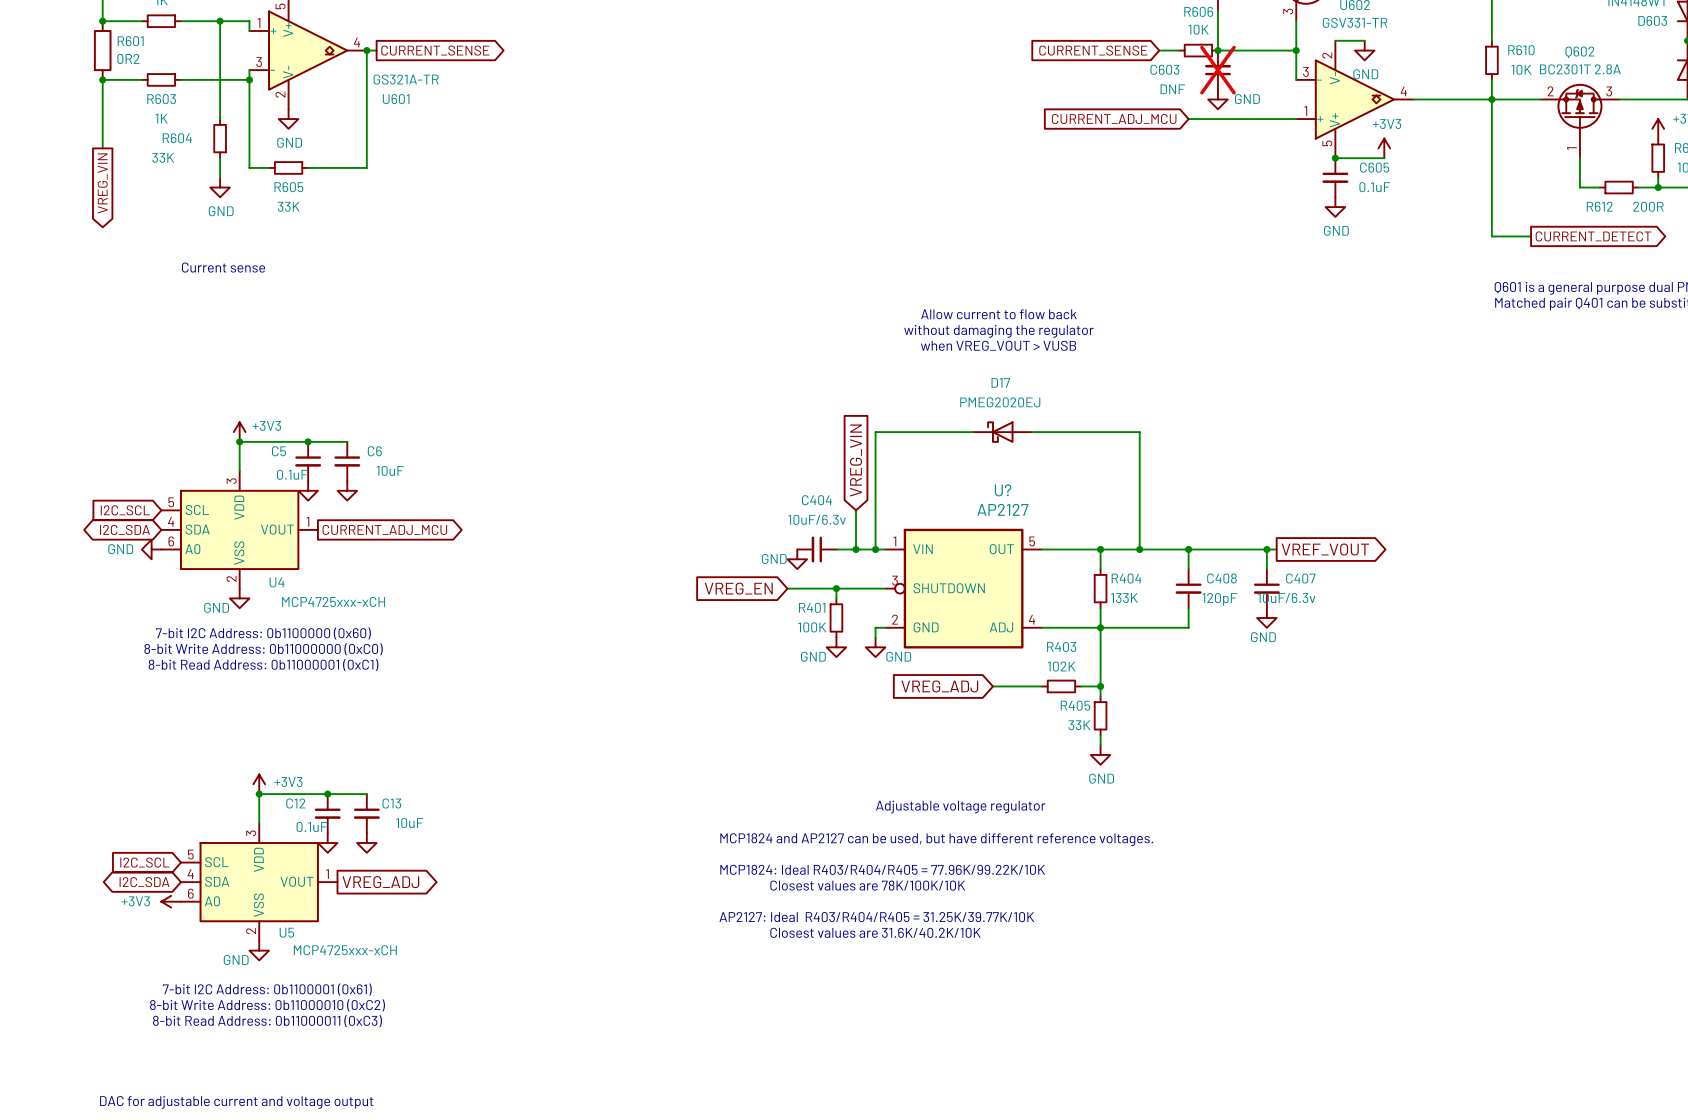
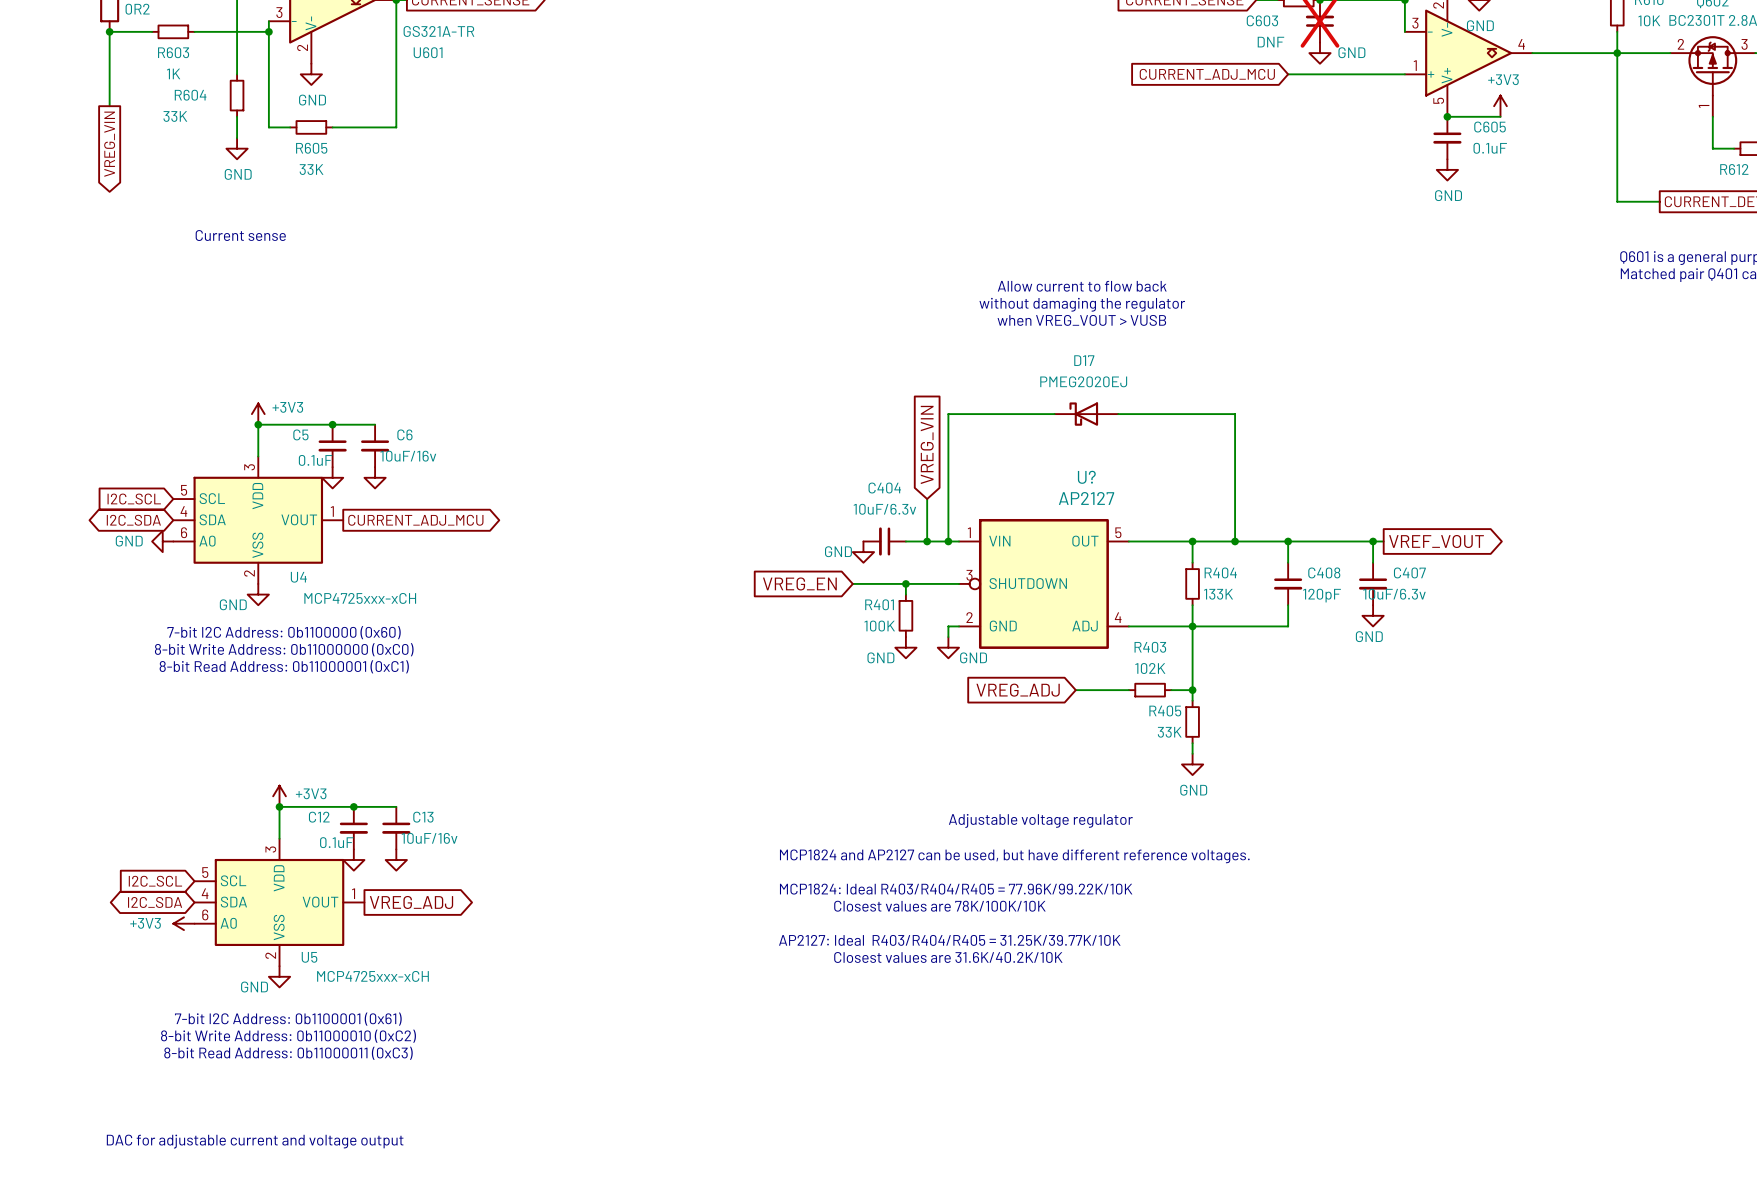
C6 value: 10uF (390, 470) -> 10uF/16v (408, 456)
C13 value: 10uF (409, 823) -> 10uF/16v (429, 838)

